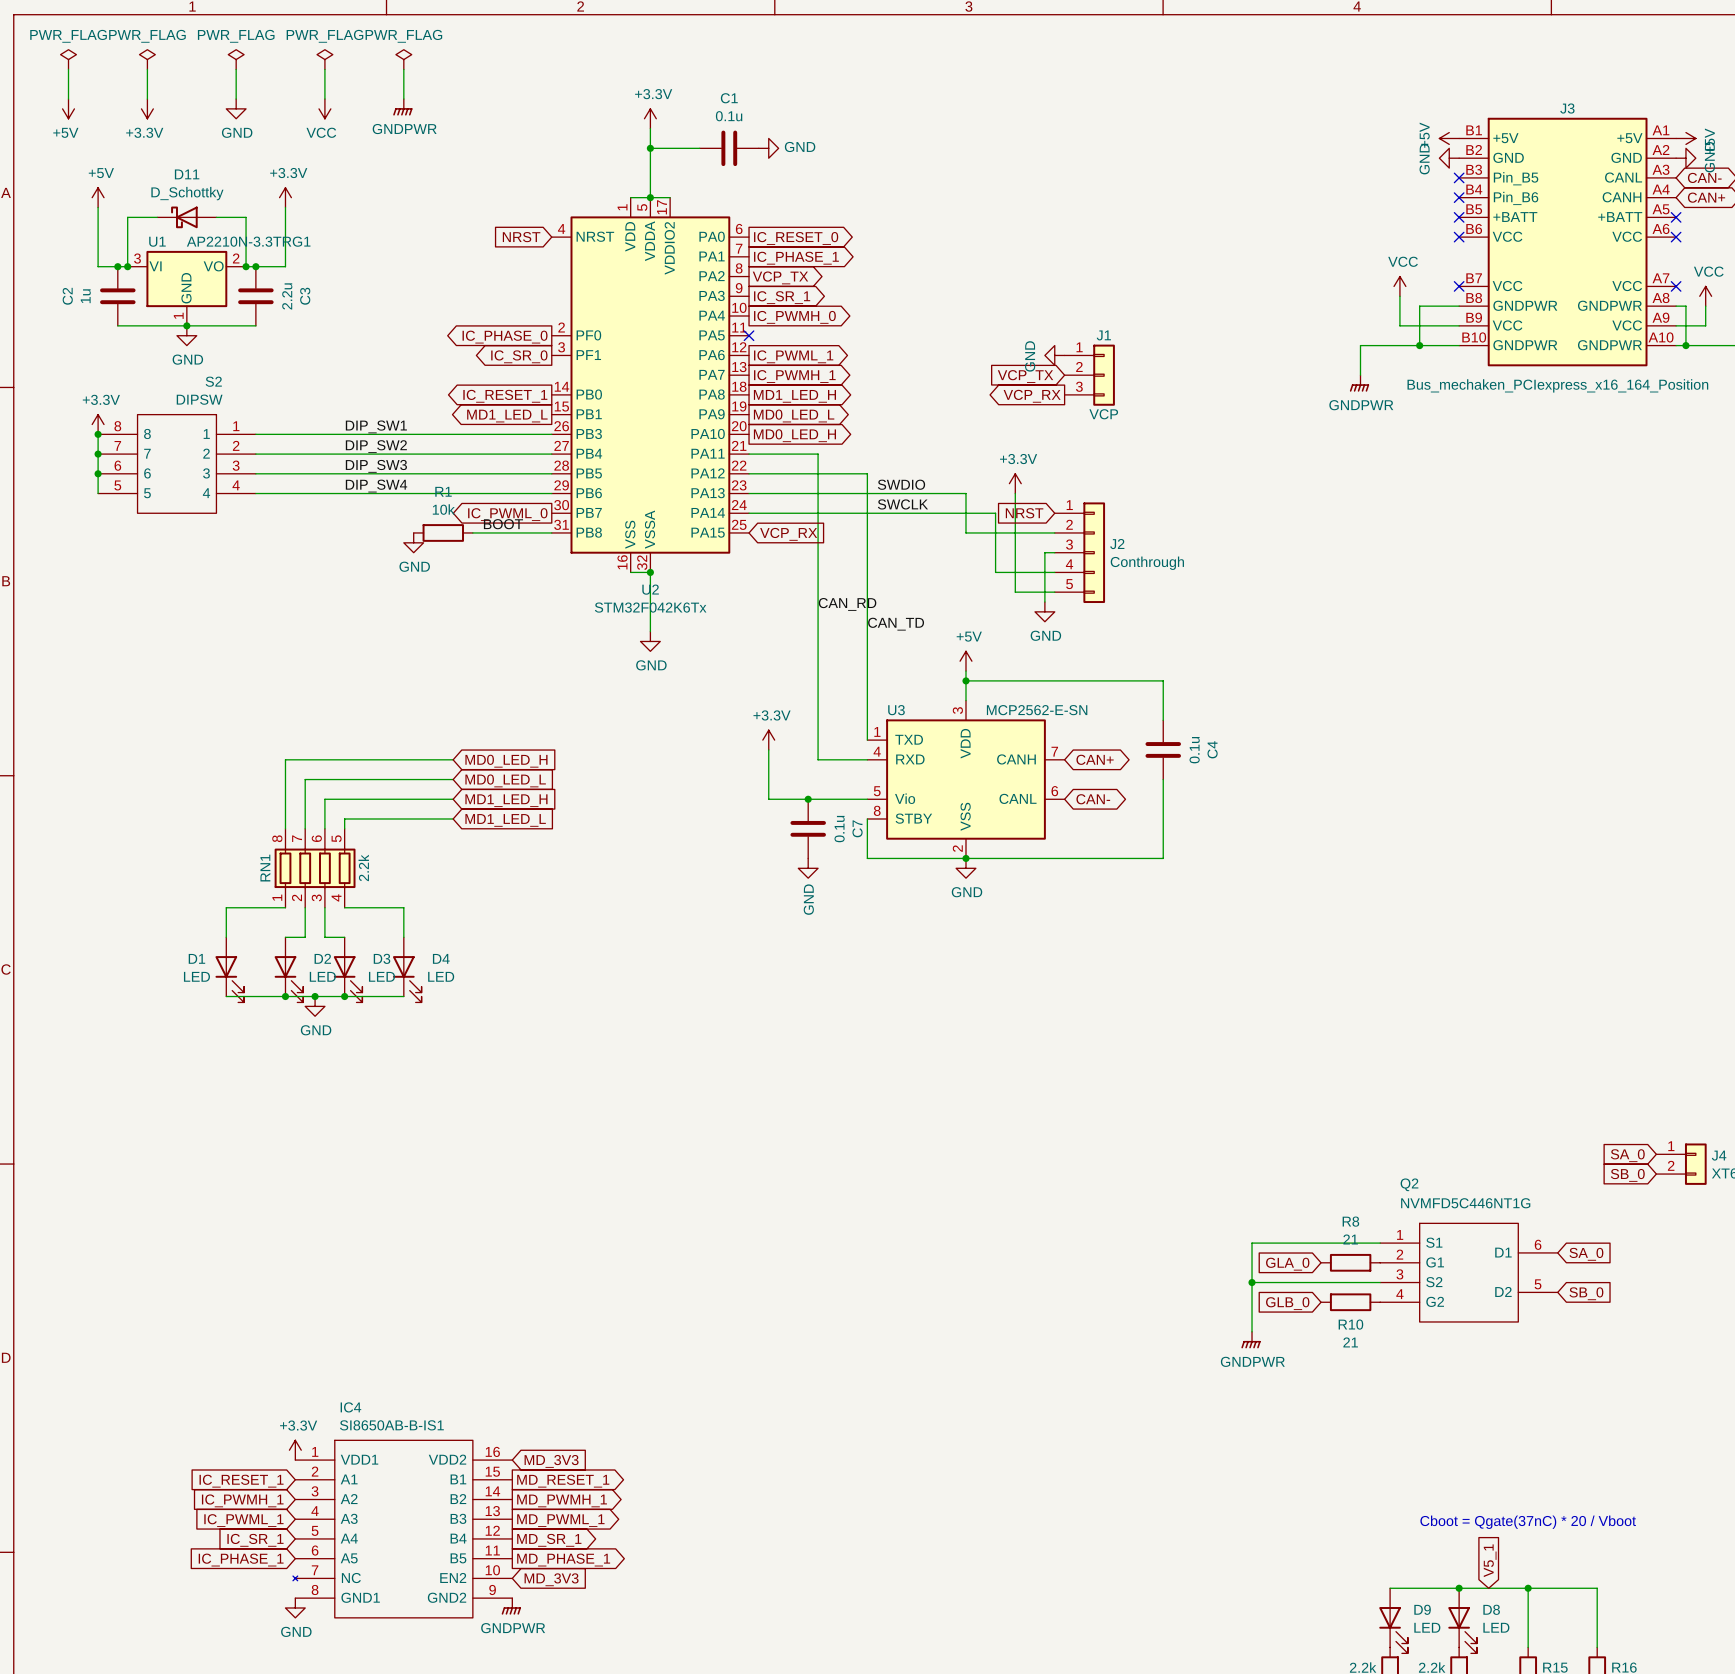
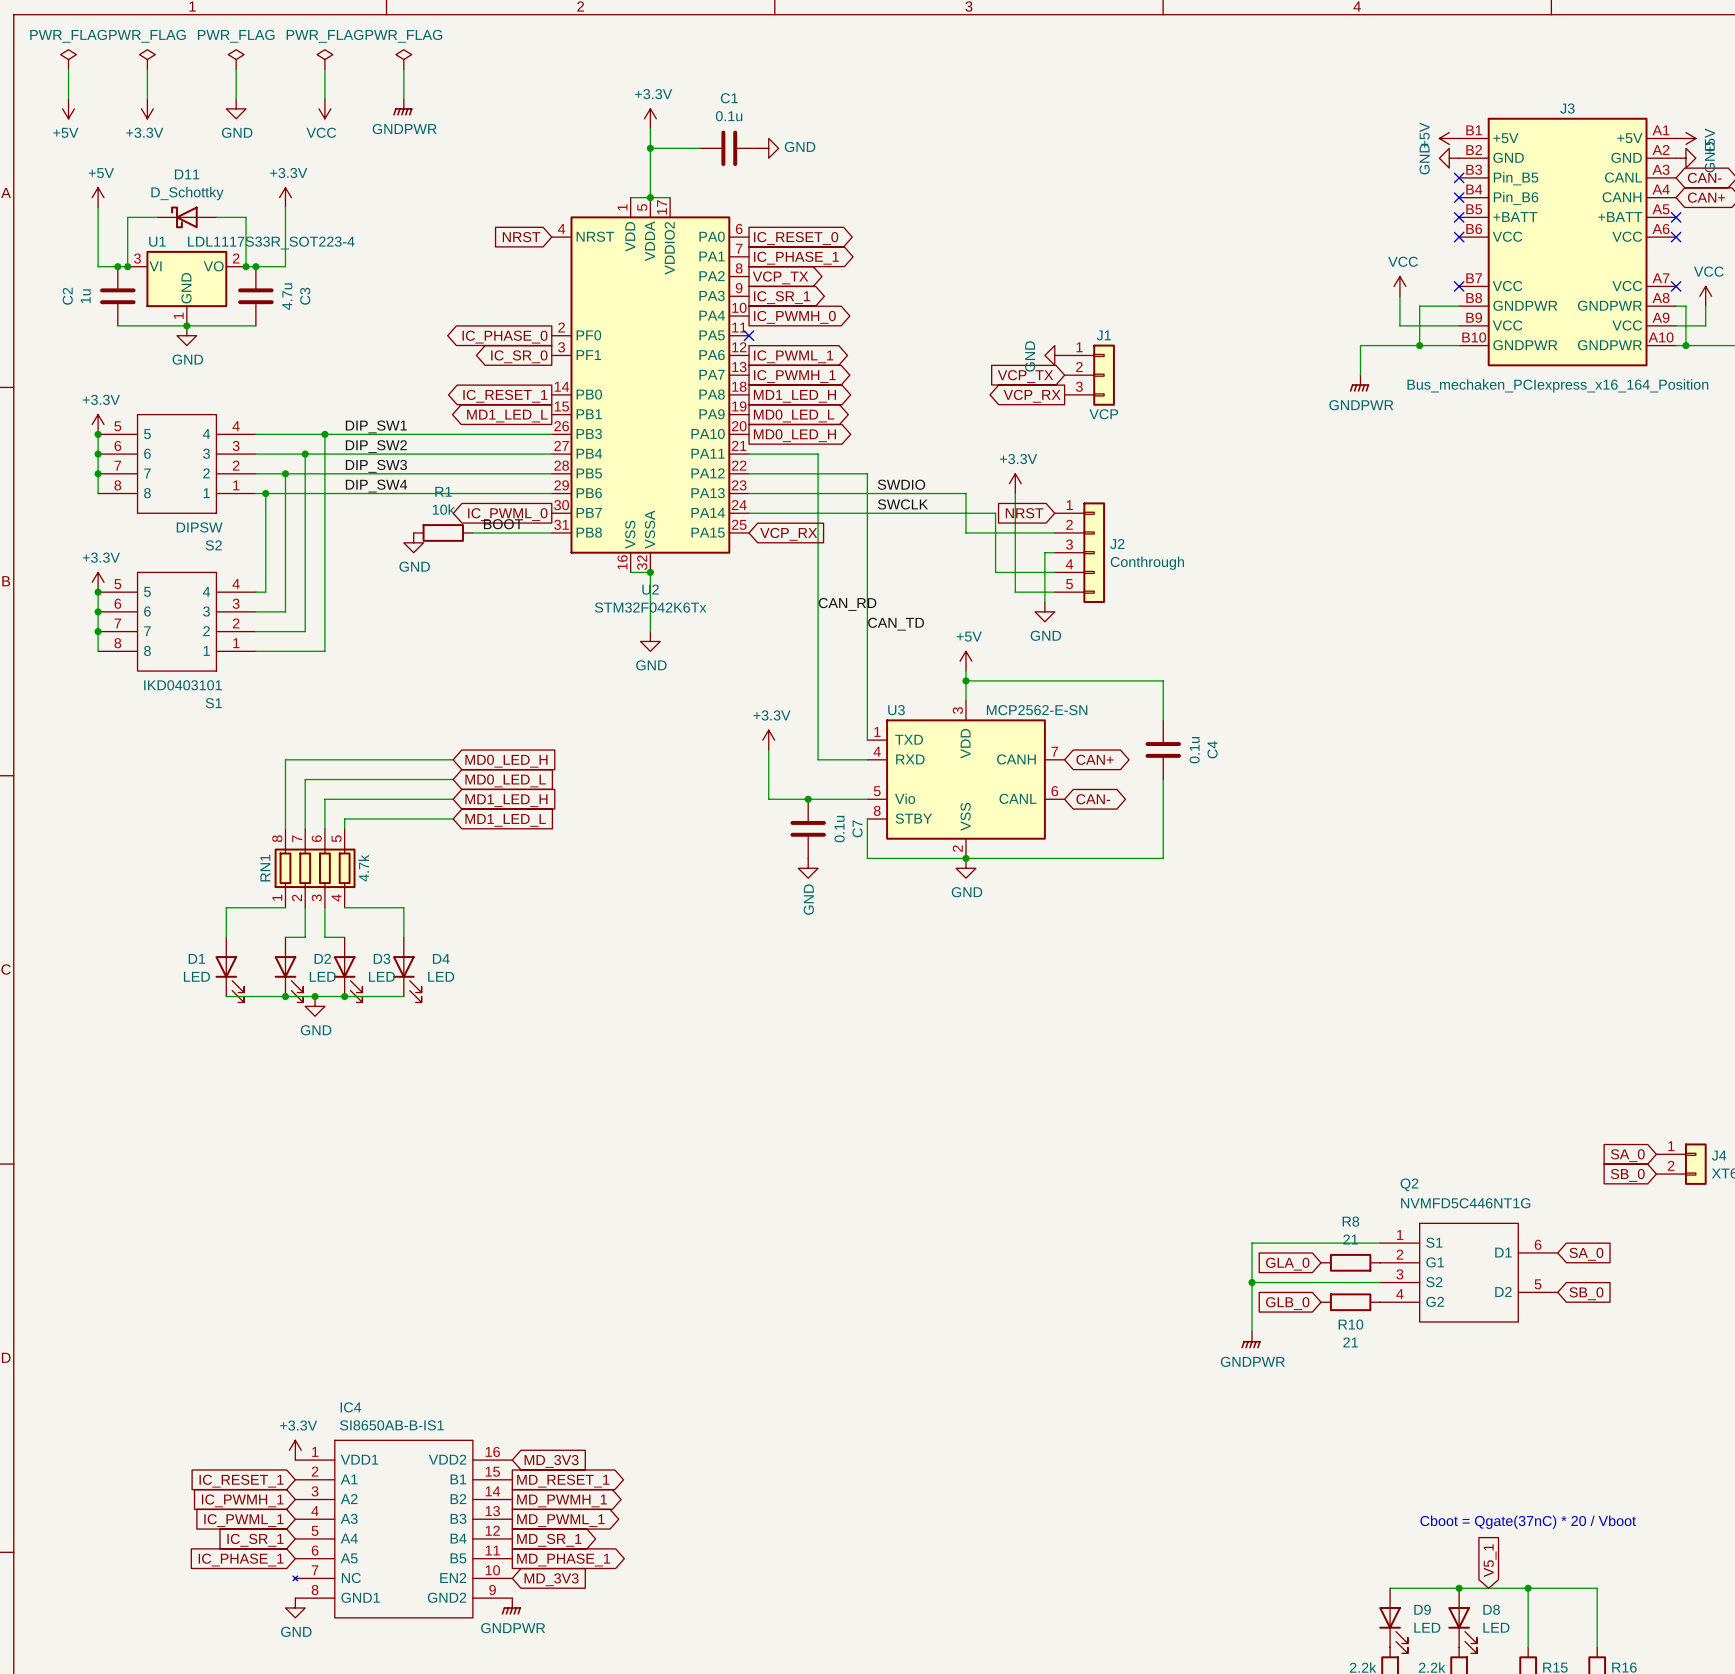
U1 value: AP2210N-3.3TRG1 (248, 241) -> LDL1117S33R_SOT223-4 (271, 243)
C3 value: 2.2u (287, 296) -> 4.7u (287, 296)
wire: none -> (324, 434) (324, 651) (255, 651)
junction: none -> (324, 434)
wire: none -> (305, 454) (305, 631) (255, 631)
junction: none -> (305, 454)
S2 flip: as is (176, 463) -> up-down (176, 463)
wire: none -> (285, 473) (285, 611) (255, 611)
junction: none -> (285, 473)
wire: none -> (265, 493) (265, 592) (255, 592)
junction: none -> (265, 493)
power symbol: none -> +3.3V (98, 582)
wire: none -> (98, 592) (98, 651)
junction: none -> (98, 592)
junction: none -> (98, 611)
S1: none -> IKD0403101 (176, 621)
junction: none -> (98, 631)
RN1 value: 2.2k (363, 867) -> 4.7k (363, 868)

